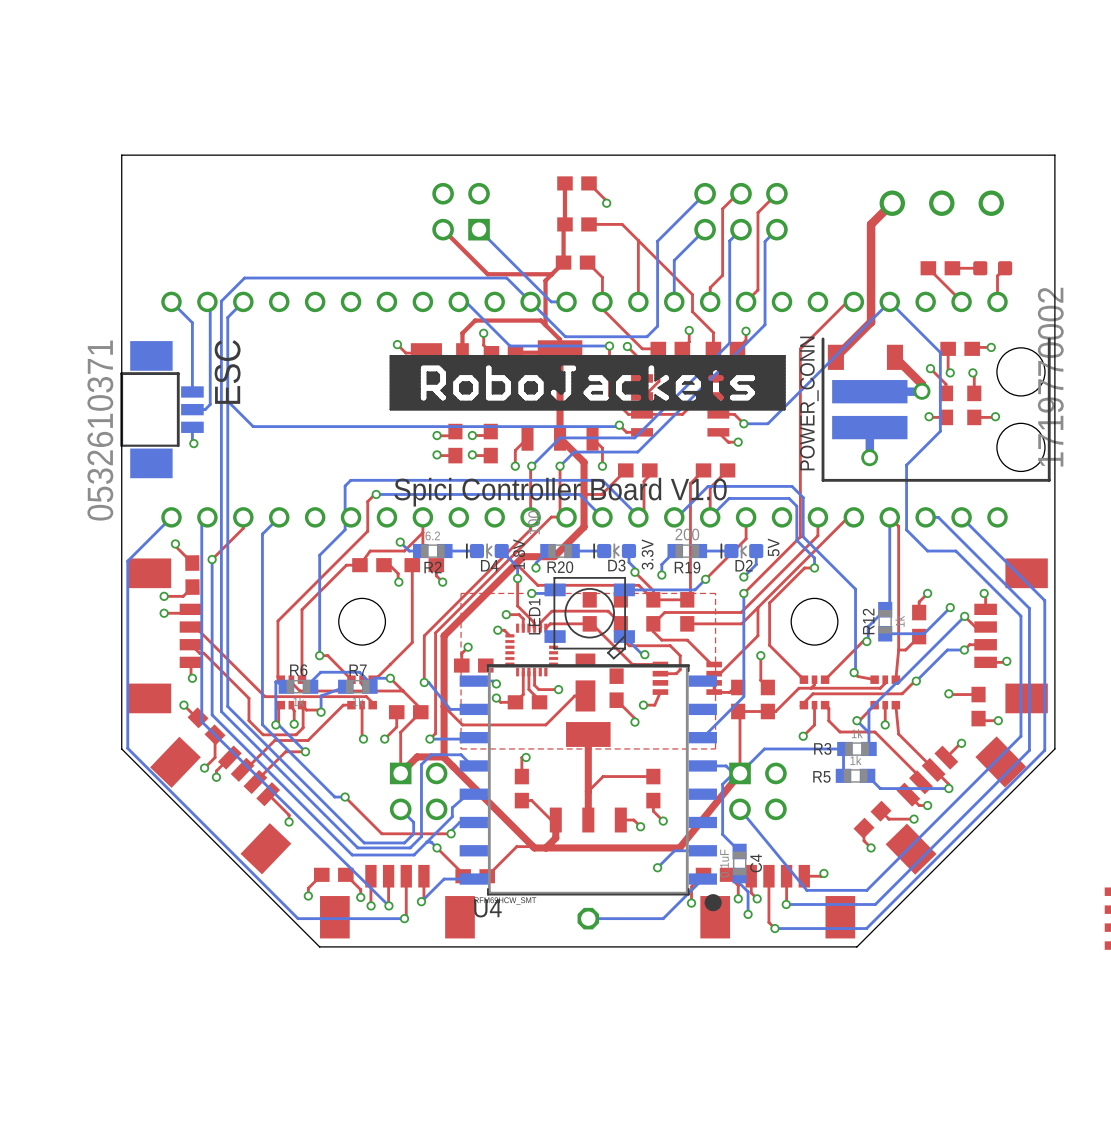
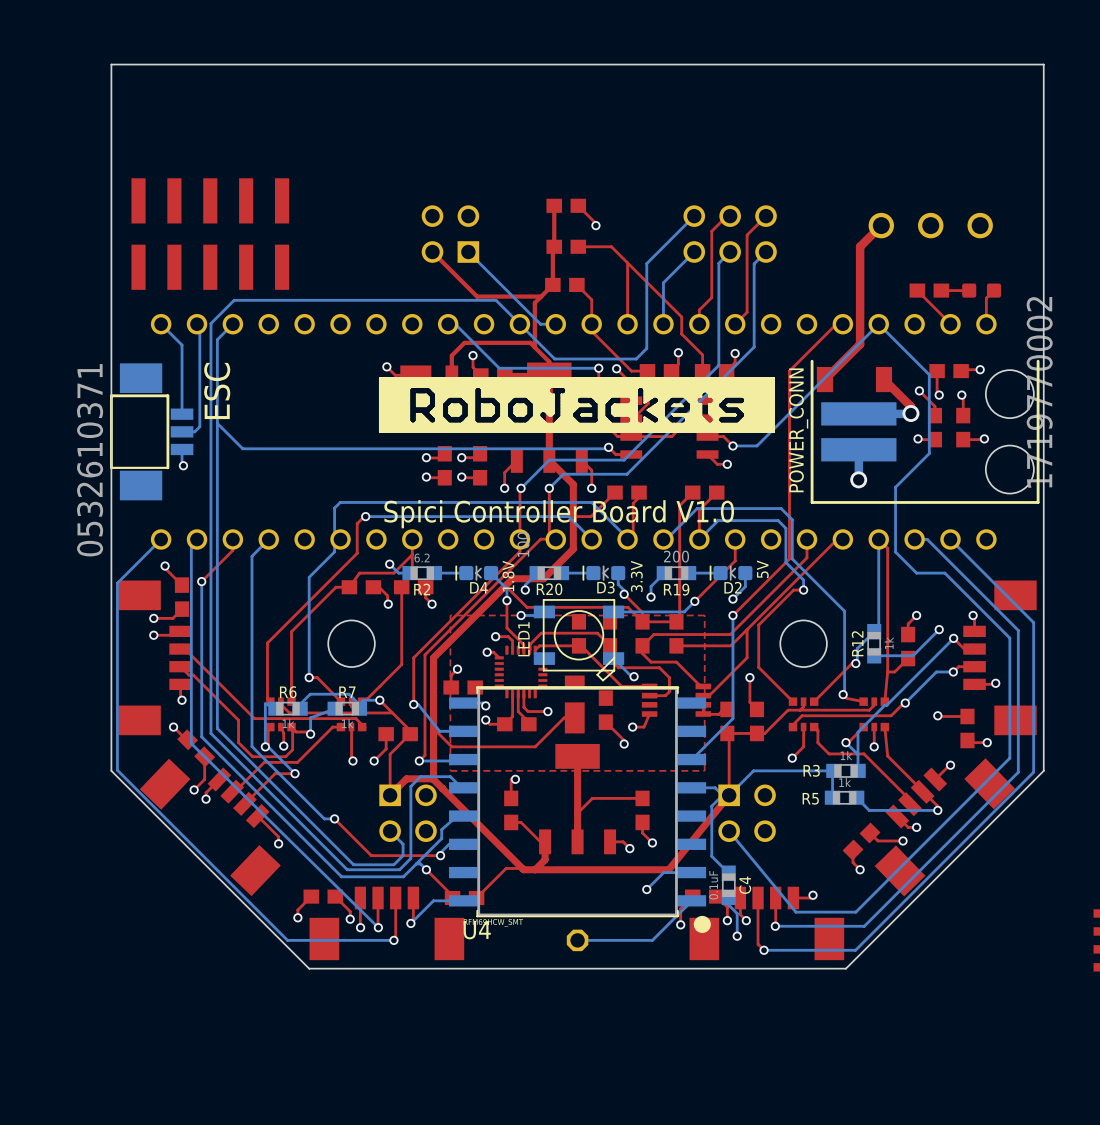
board edge: (1054, 155) (121, 155) -> (1043, 177) (1043, 64) (111, 64) (111, 177)
part: none -> (210, 234)

